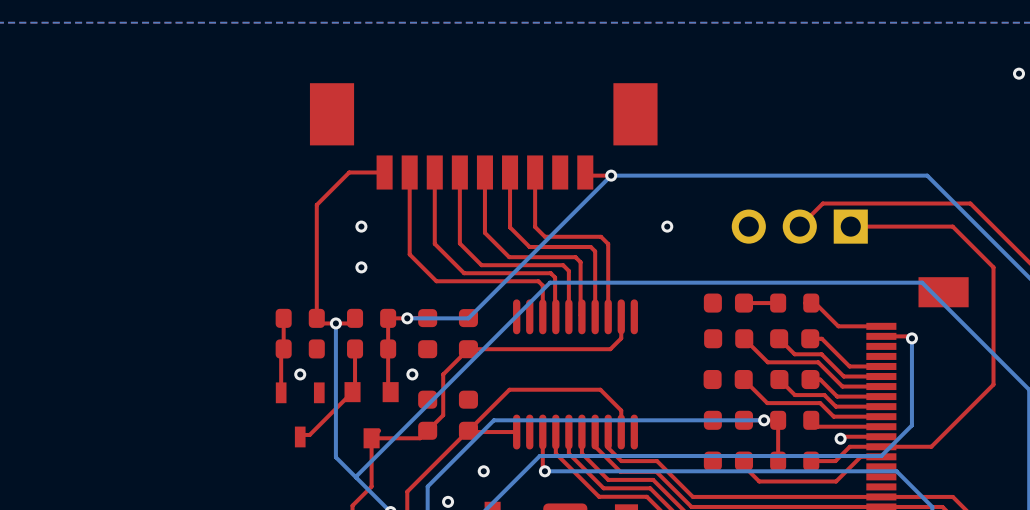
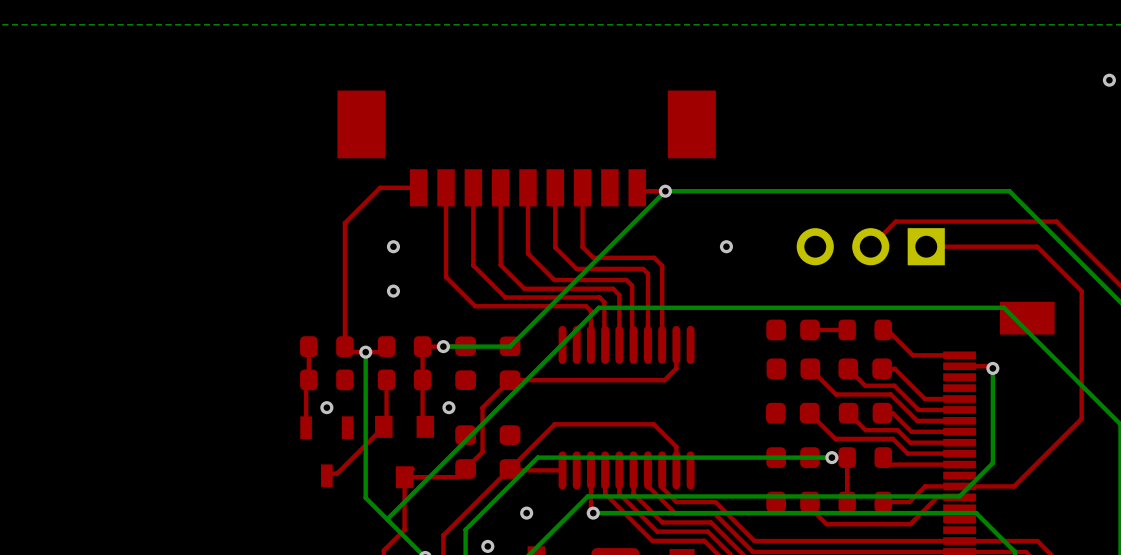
top track: (881, 436) (840, 435) (840, 438) -> none
via: (840, 438) -> none

